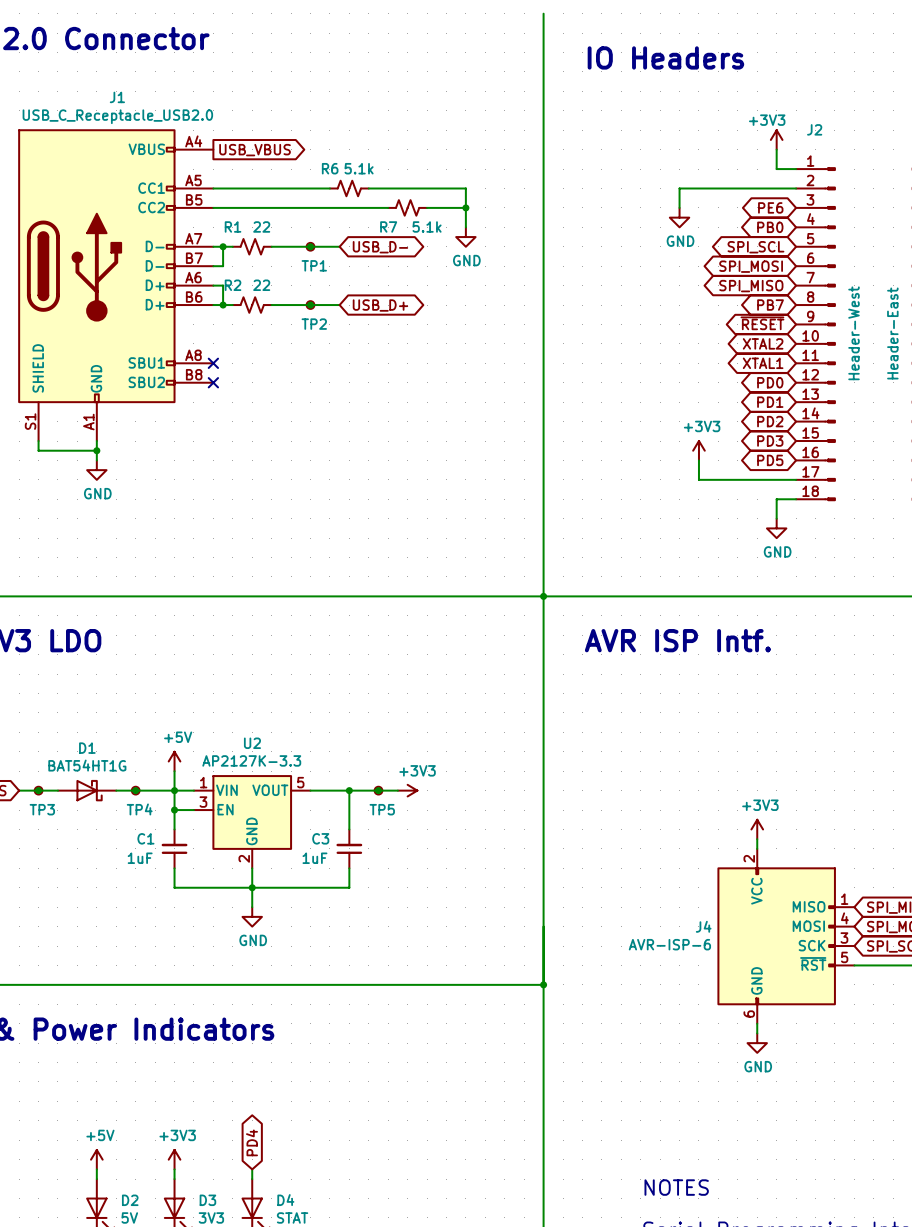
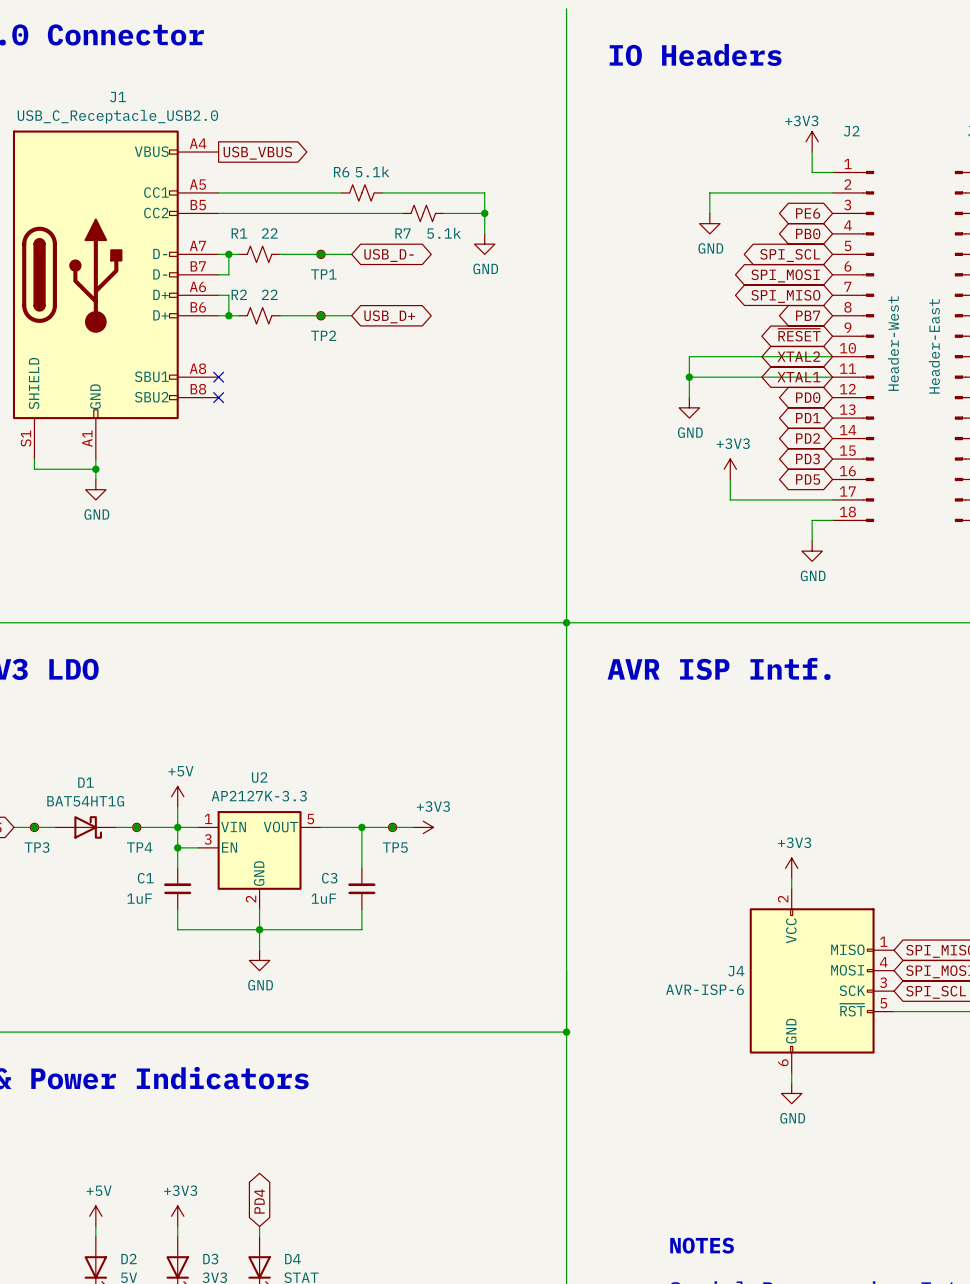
wire: none -> (832, 356) (689, 356) (689, 397)
wire: none -> (689, 377) (832, 377)
junction: none -> (689, 377)
power symbol: none -> GND (689, 407)

